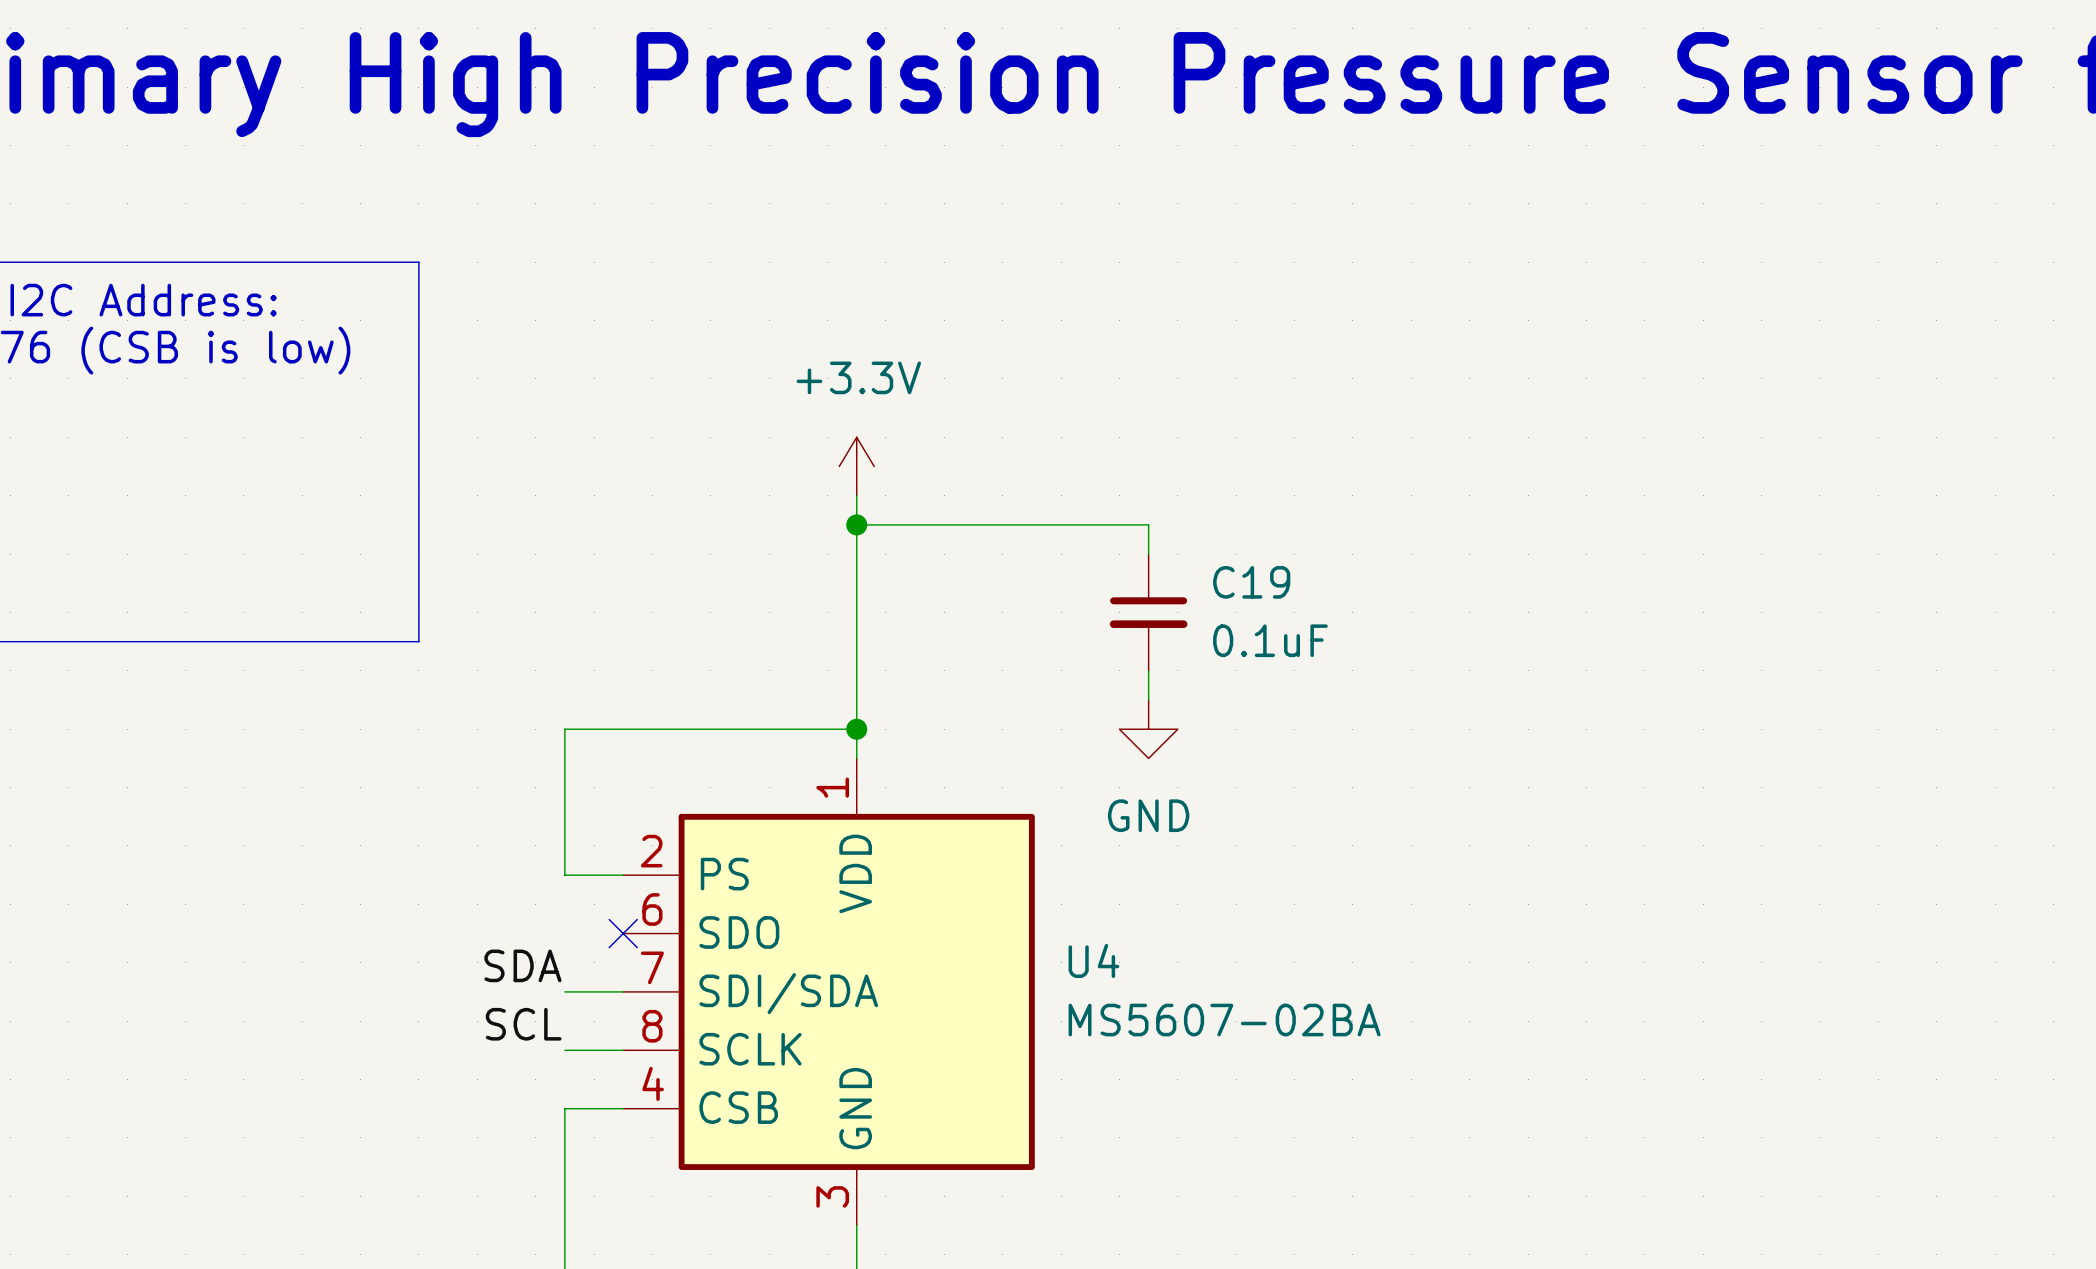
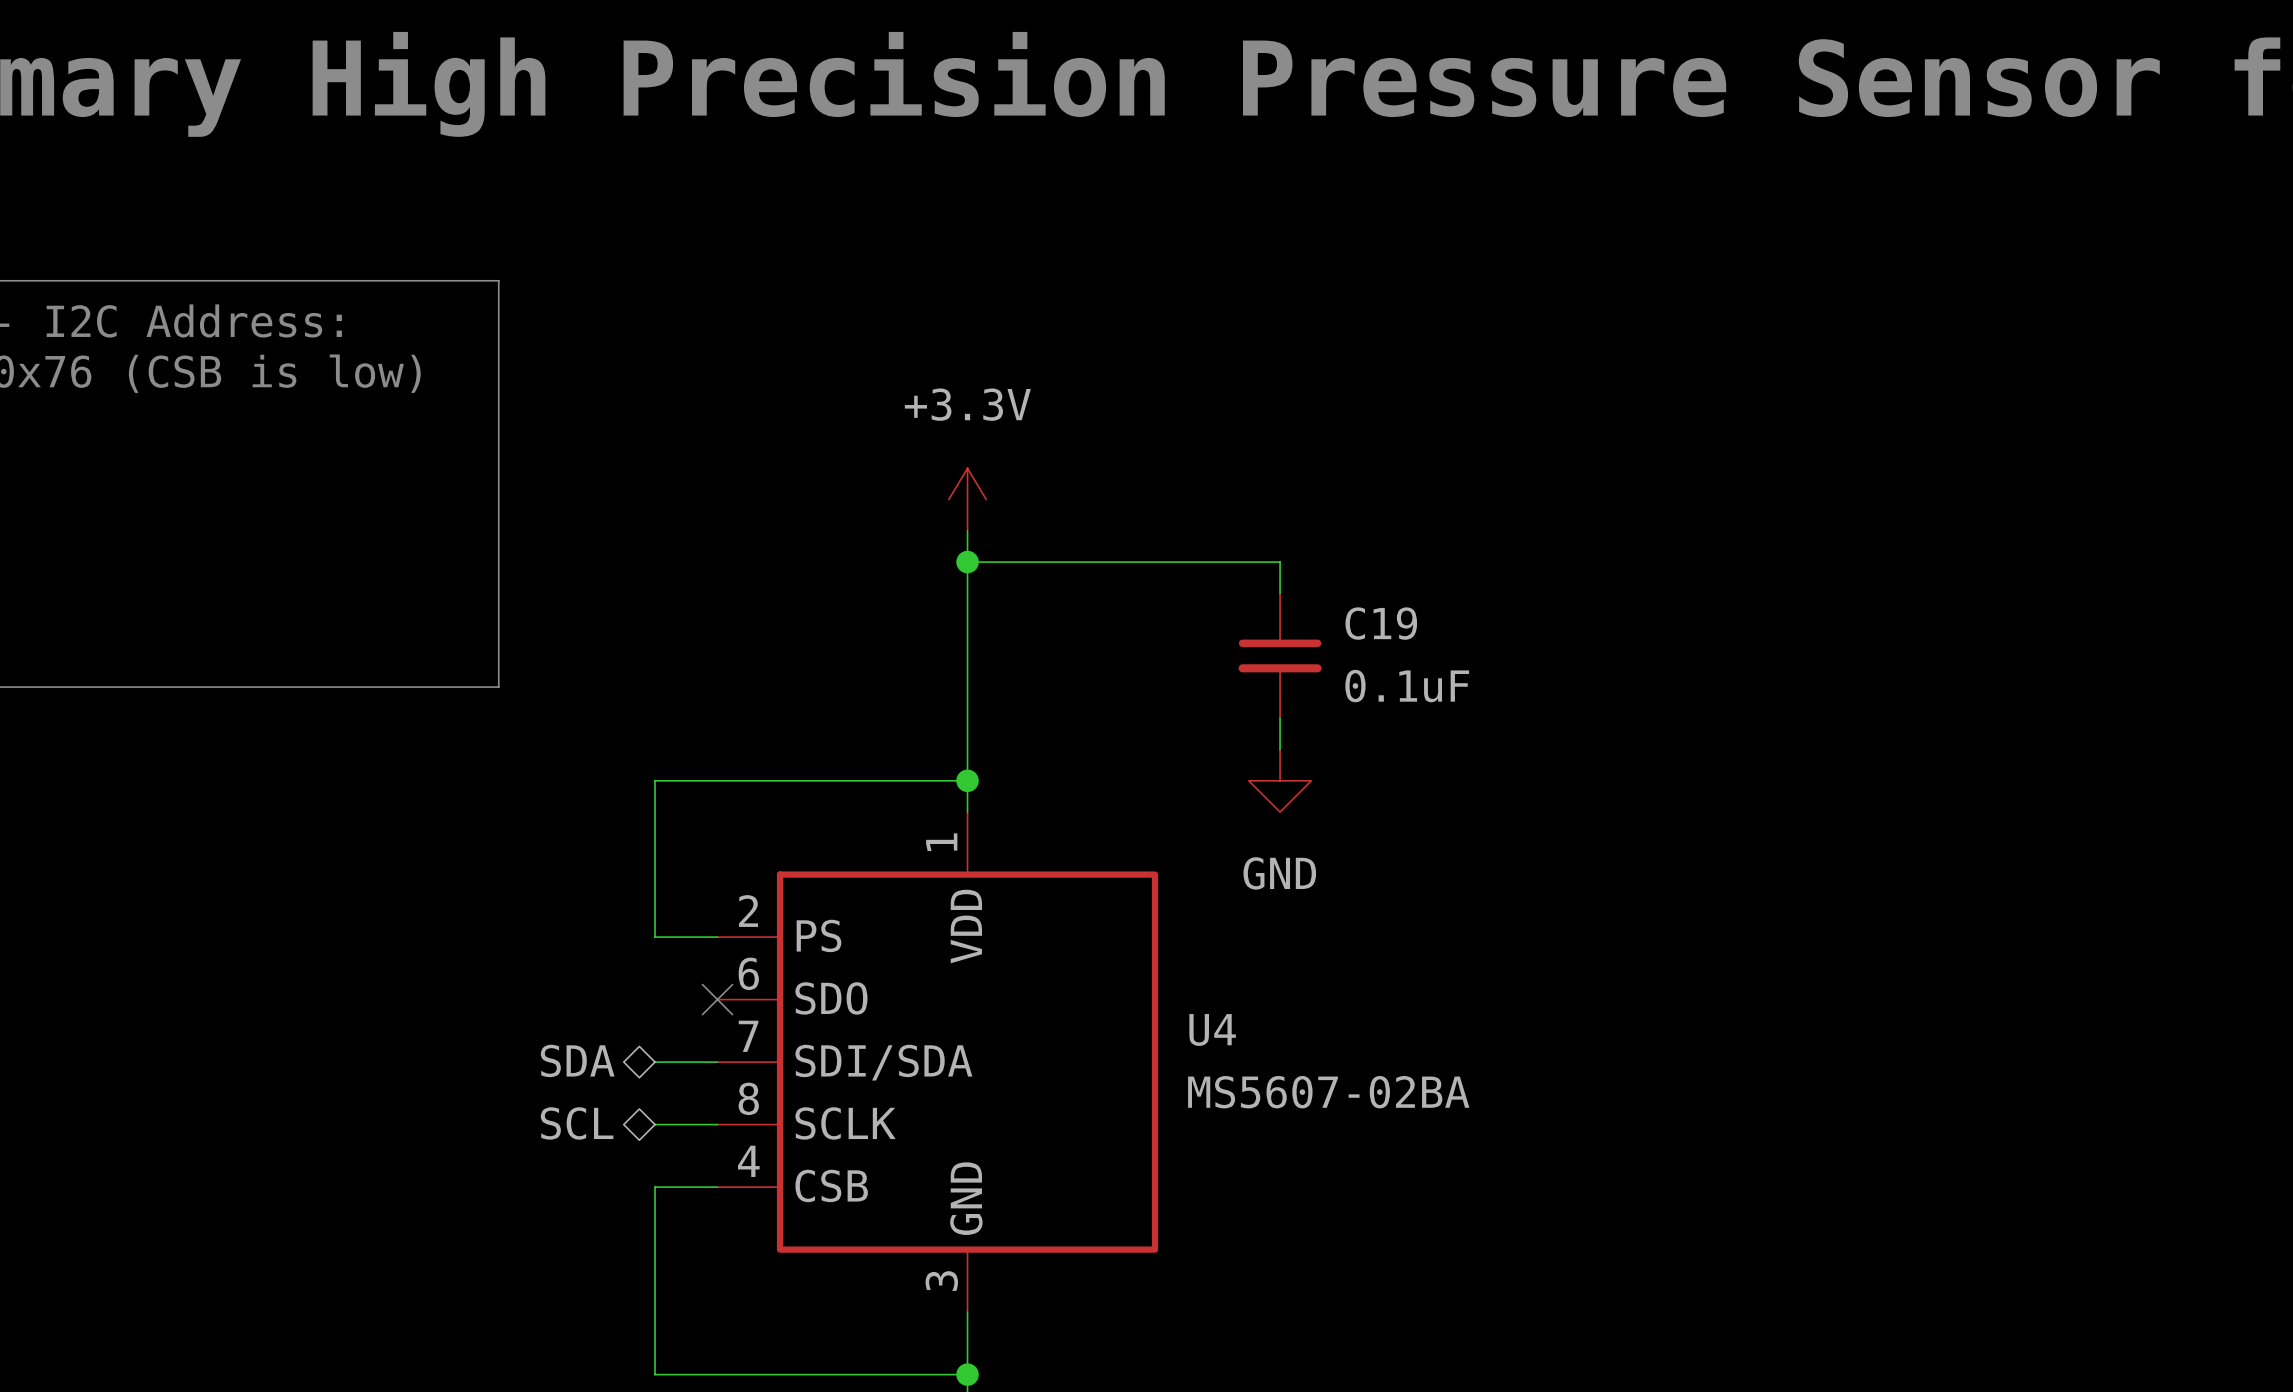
label: SDA (522, 965) -> none
hierarchical label: none -> SDA (577, 1060)
label: SCL (523, 1024) -> none
hierarchical label: none -> SCL (577, 1123)

